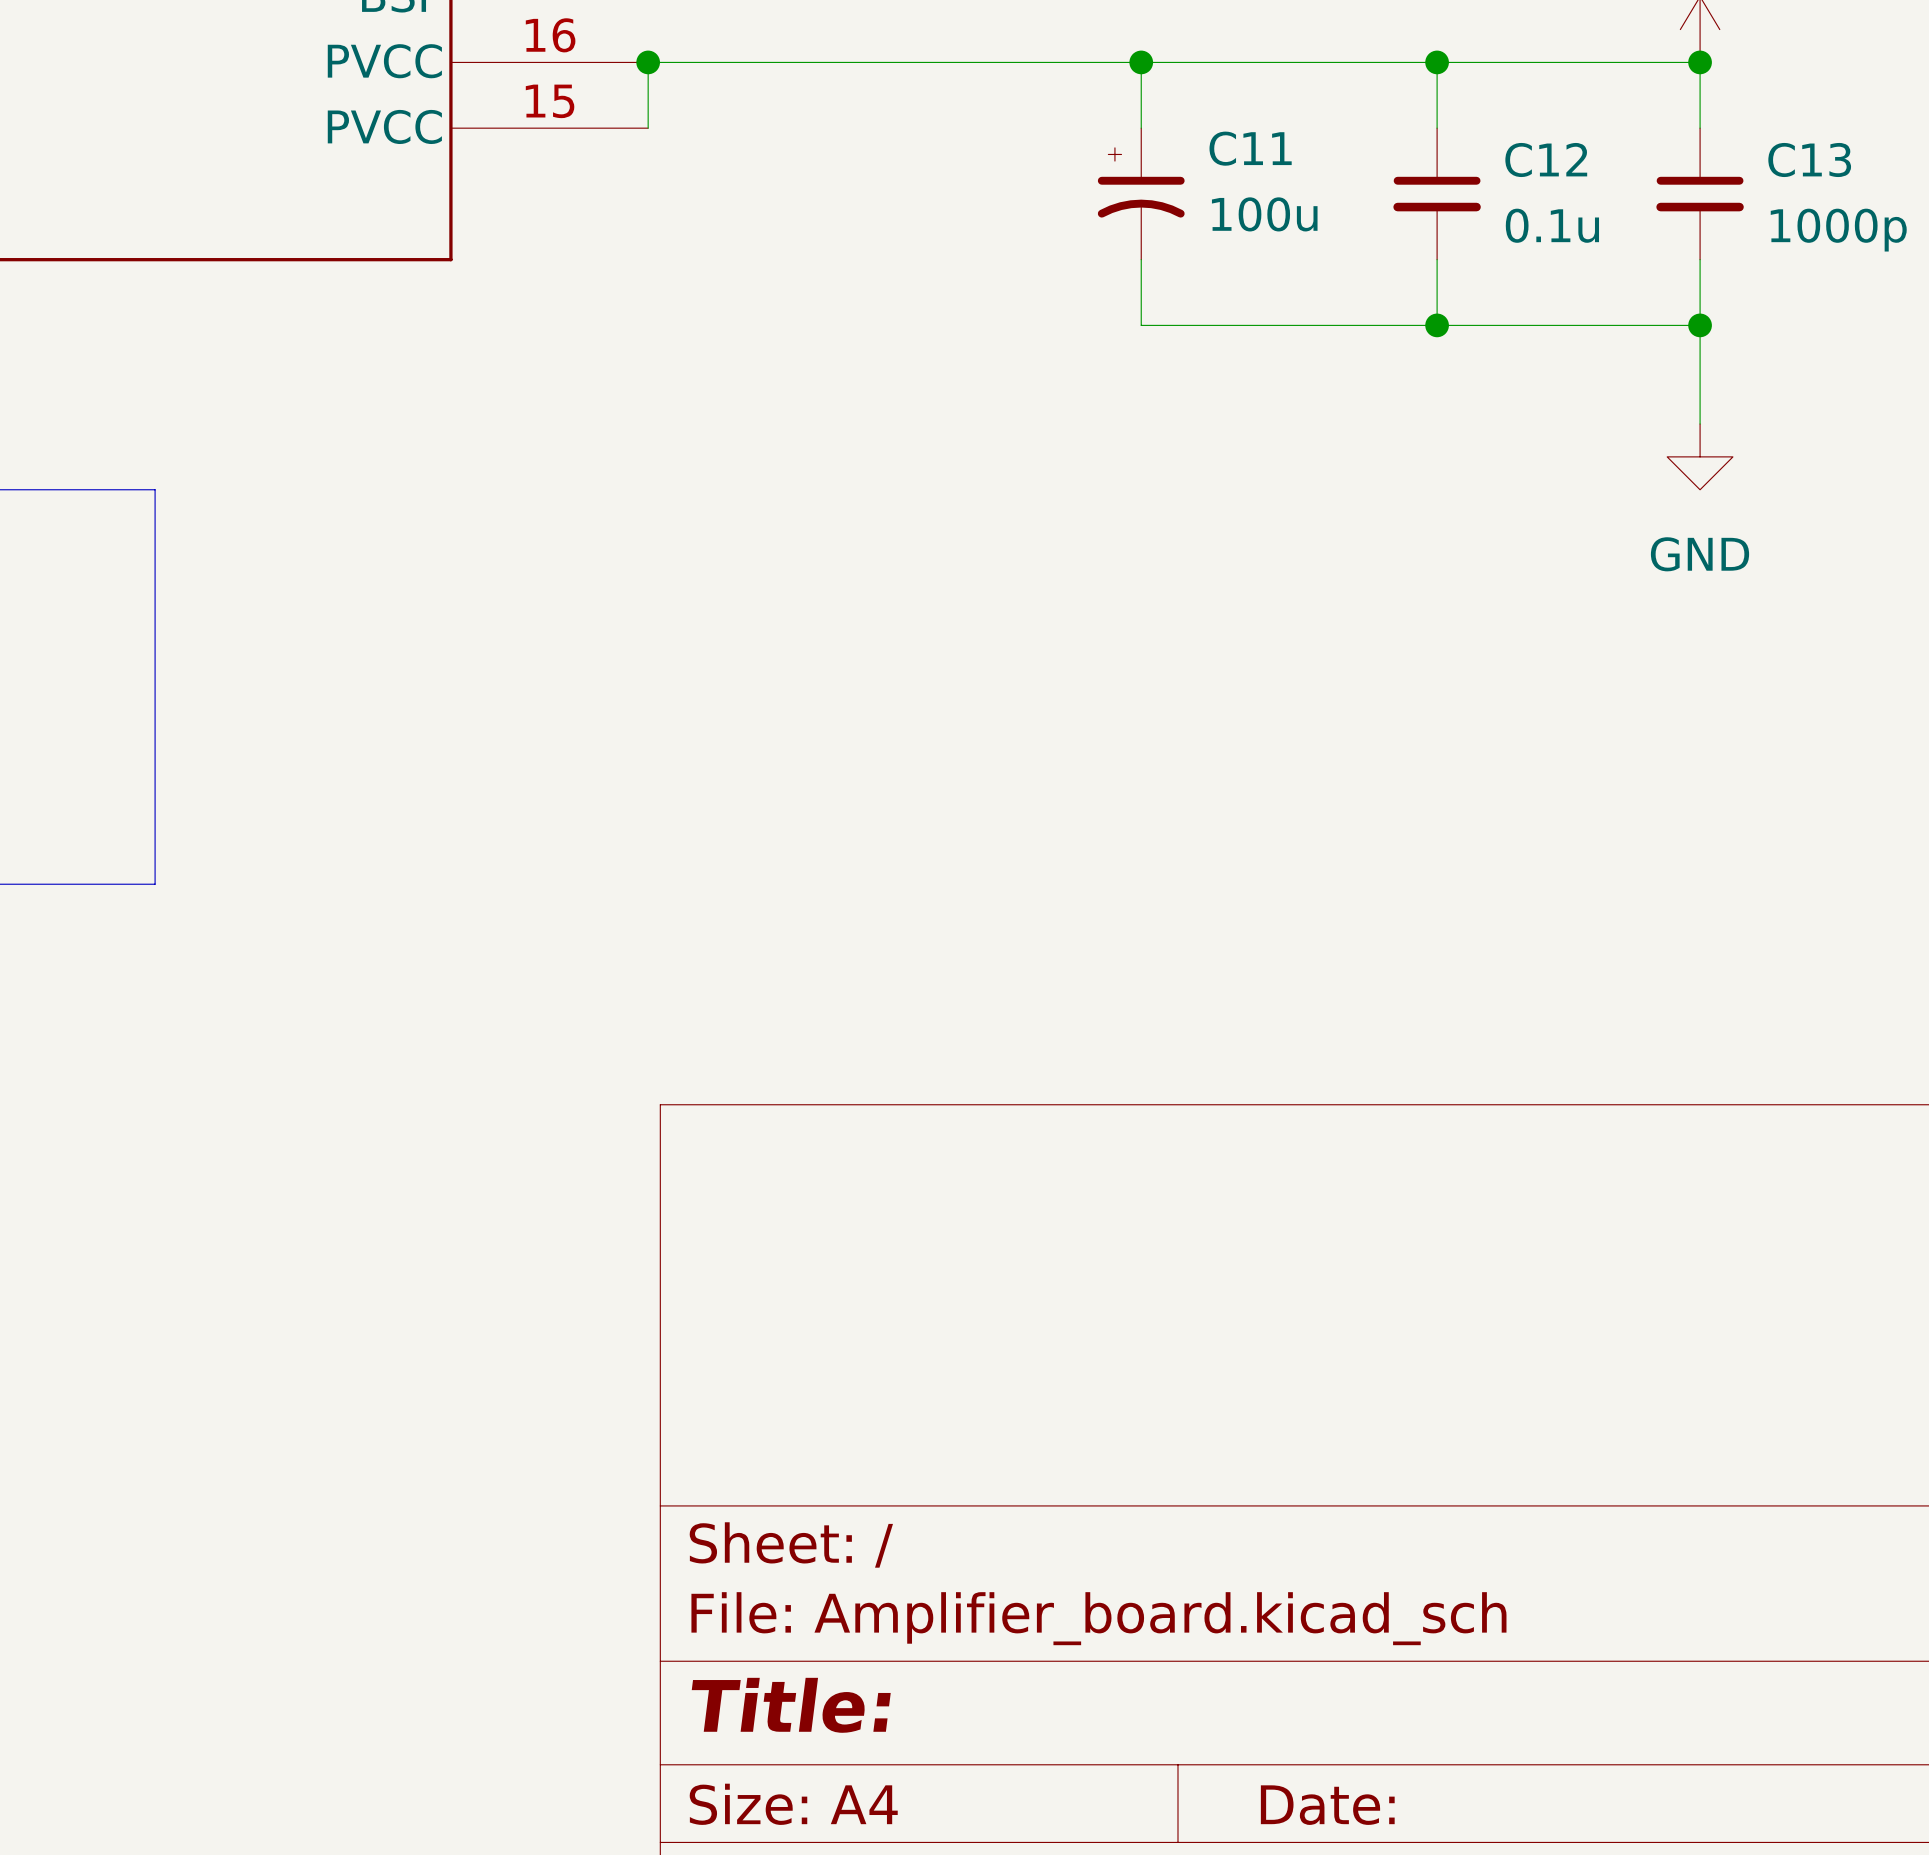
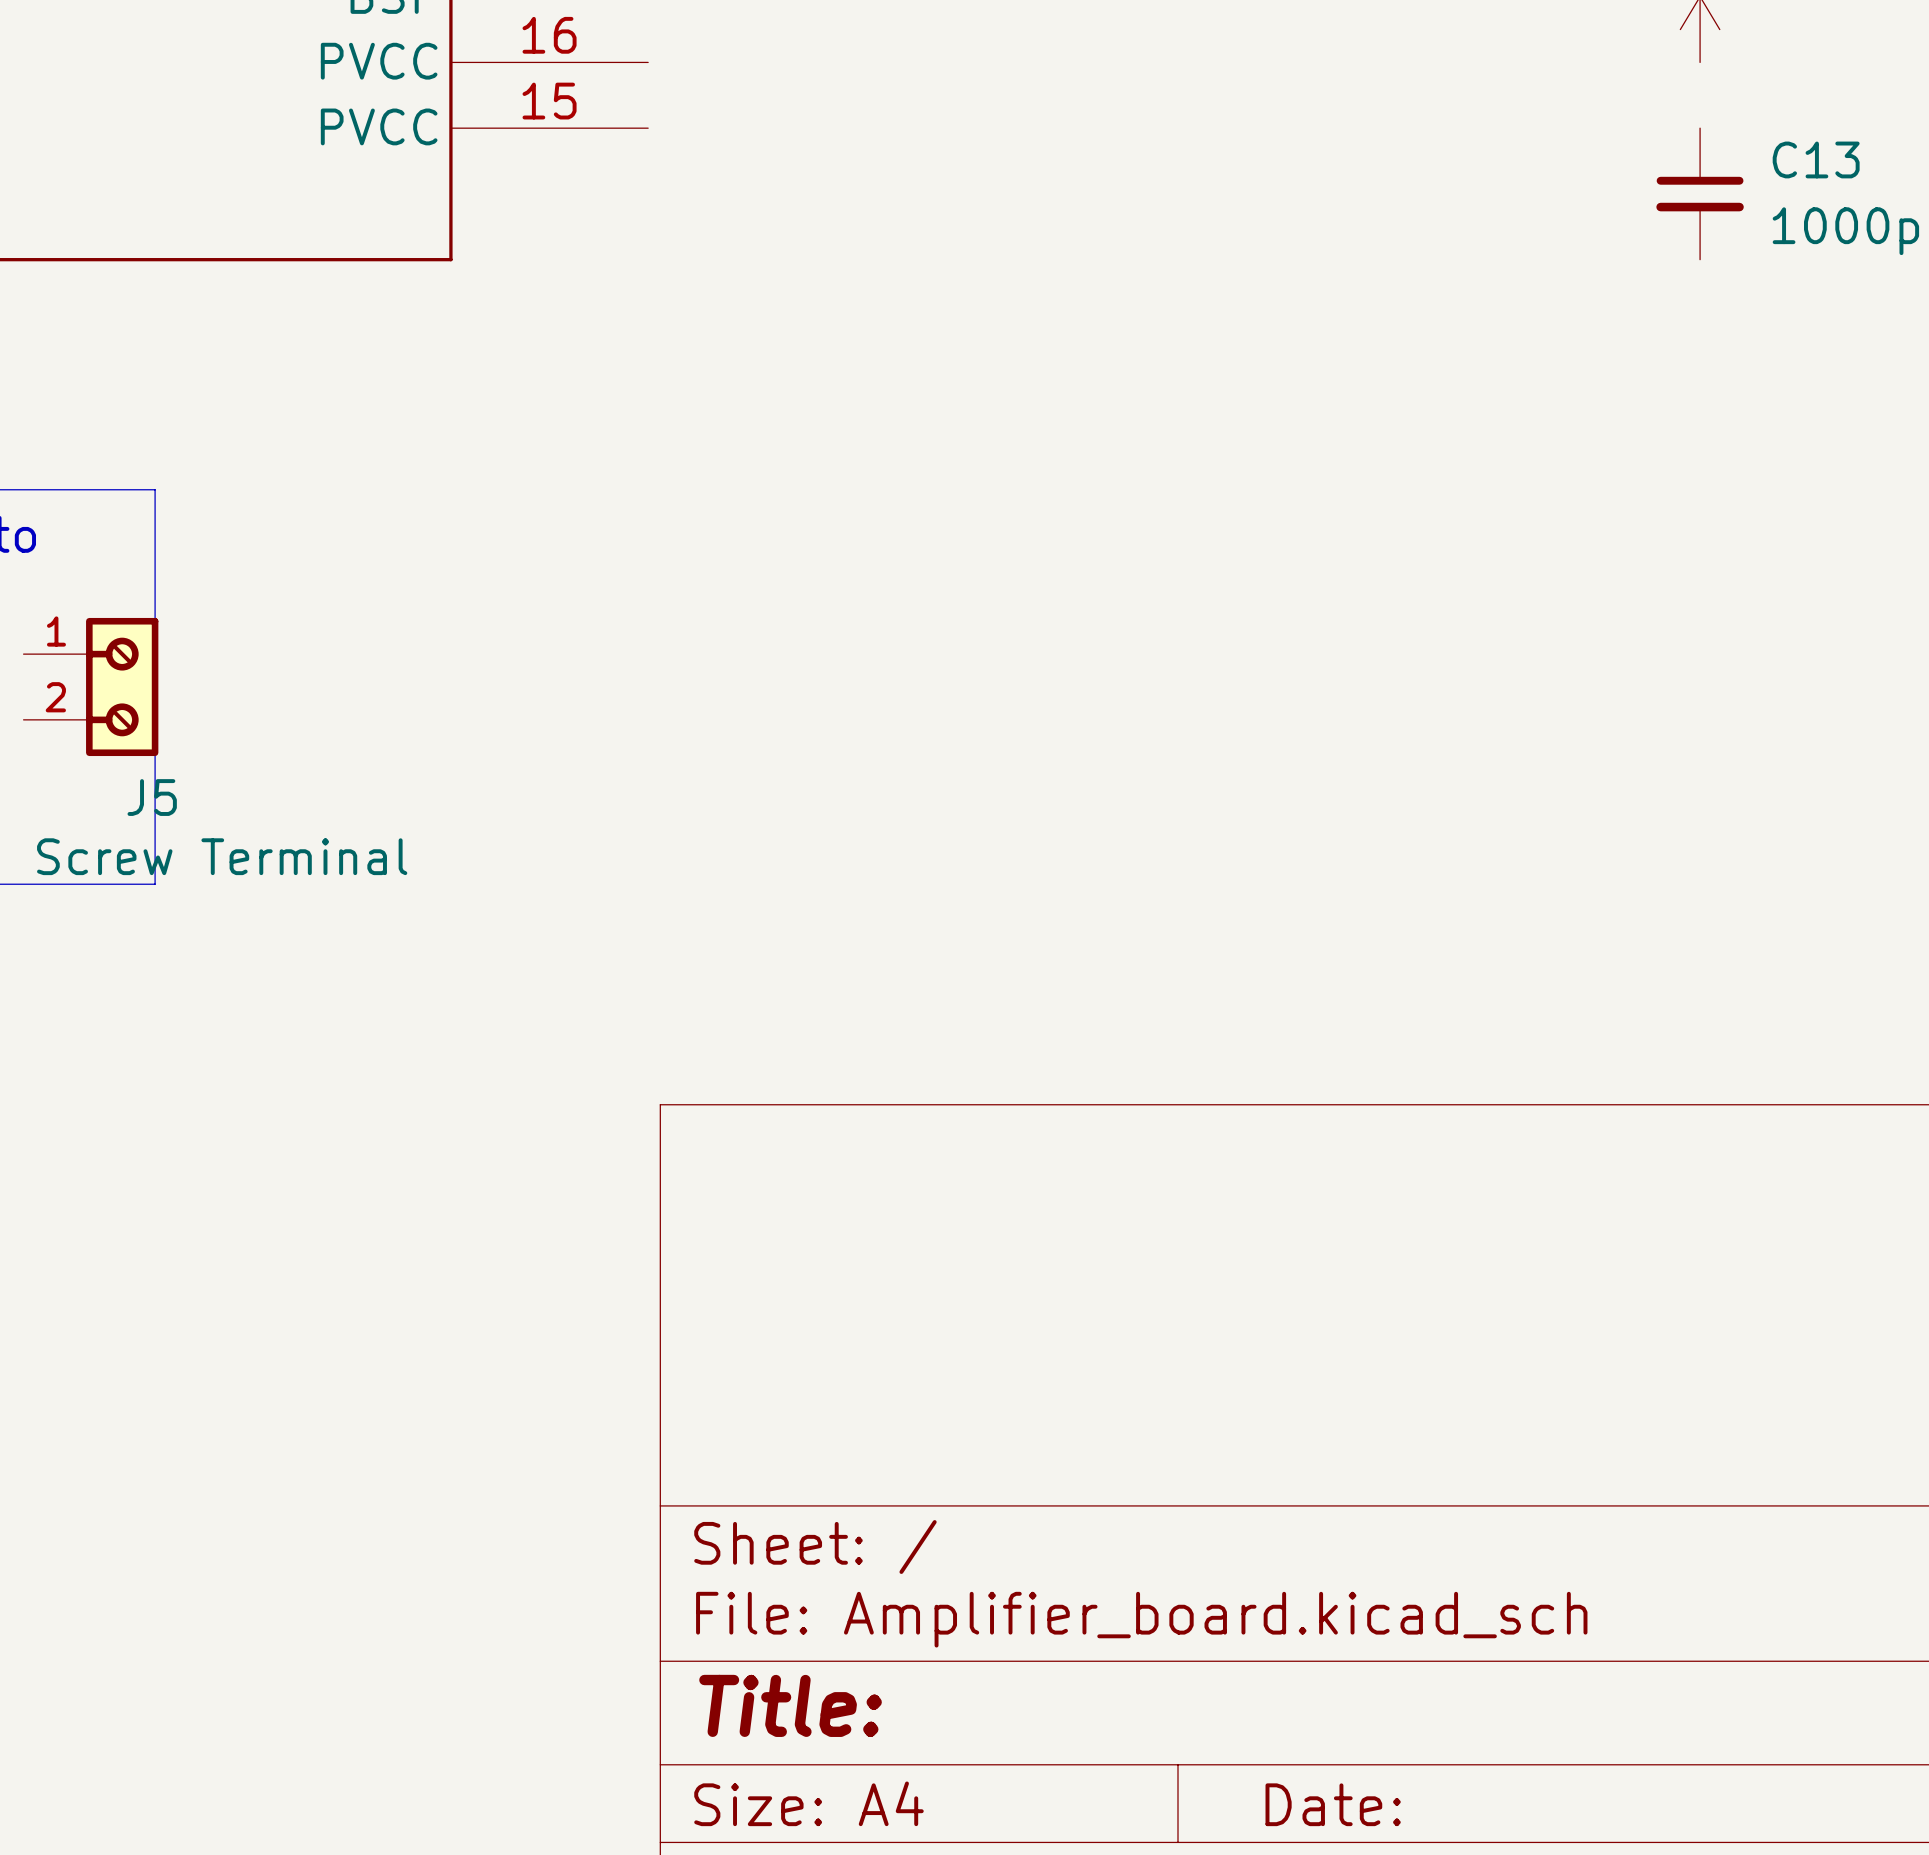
junction: (648, 62) -> none
wire: (1141, 62) (1141, 128) -> none
junction: (1141, 62) -> none
wire: (1437, 62) (1437, 128) -> none
junction: (1437, 62) -> none
junction: (1700, 62) -> none
wire: (648, 128) (648, 62) (1700, 62) (1700, 128) -> none
C11: 100u (1141, 193) -> none
C12: 0.1u (1437, 193) -> none
wire: (1141, 259) (1141, 325) (1700, 325) -> none
wire: (1437, 259) (1437, 325) -> none
wire: (1700, 259) (1700, 424) -> none
junction: (1437, 325) -> none
junction: (1700, 325) -> none
power symbol: GND (1700, 456) -> none
J5: none -> Screw Terminal (90, 686)

